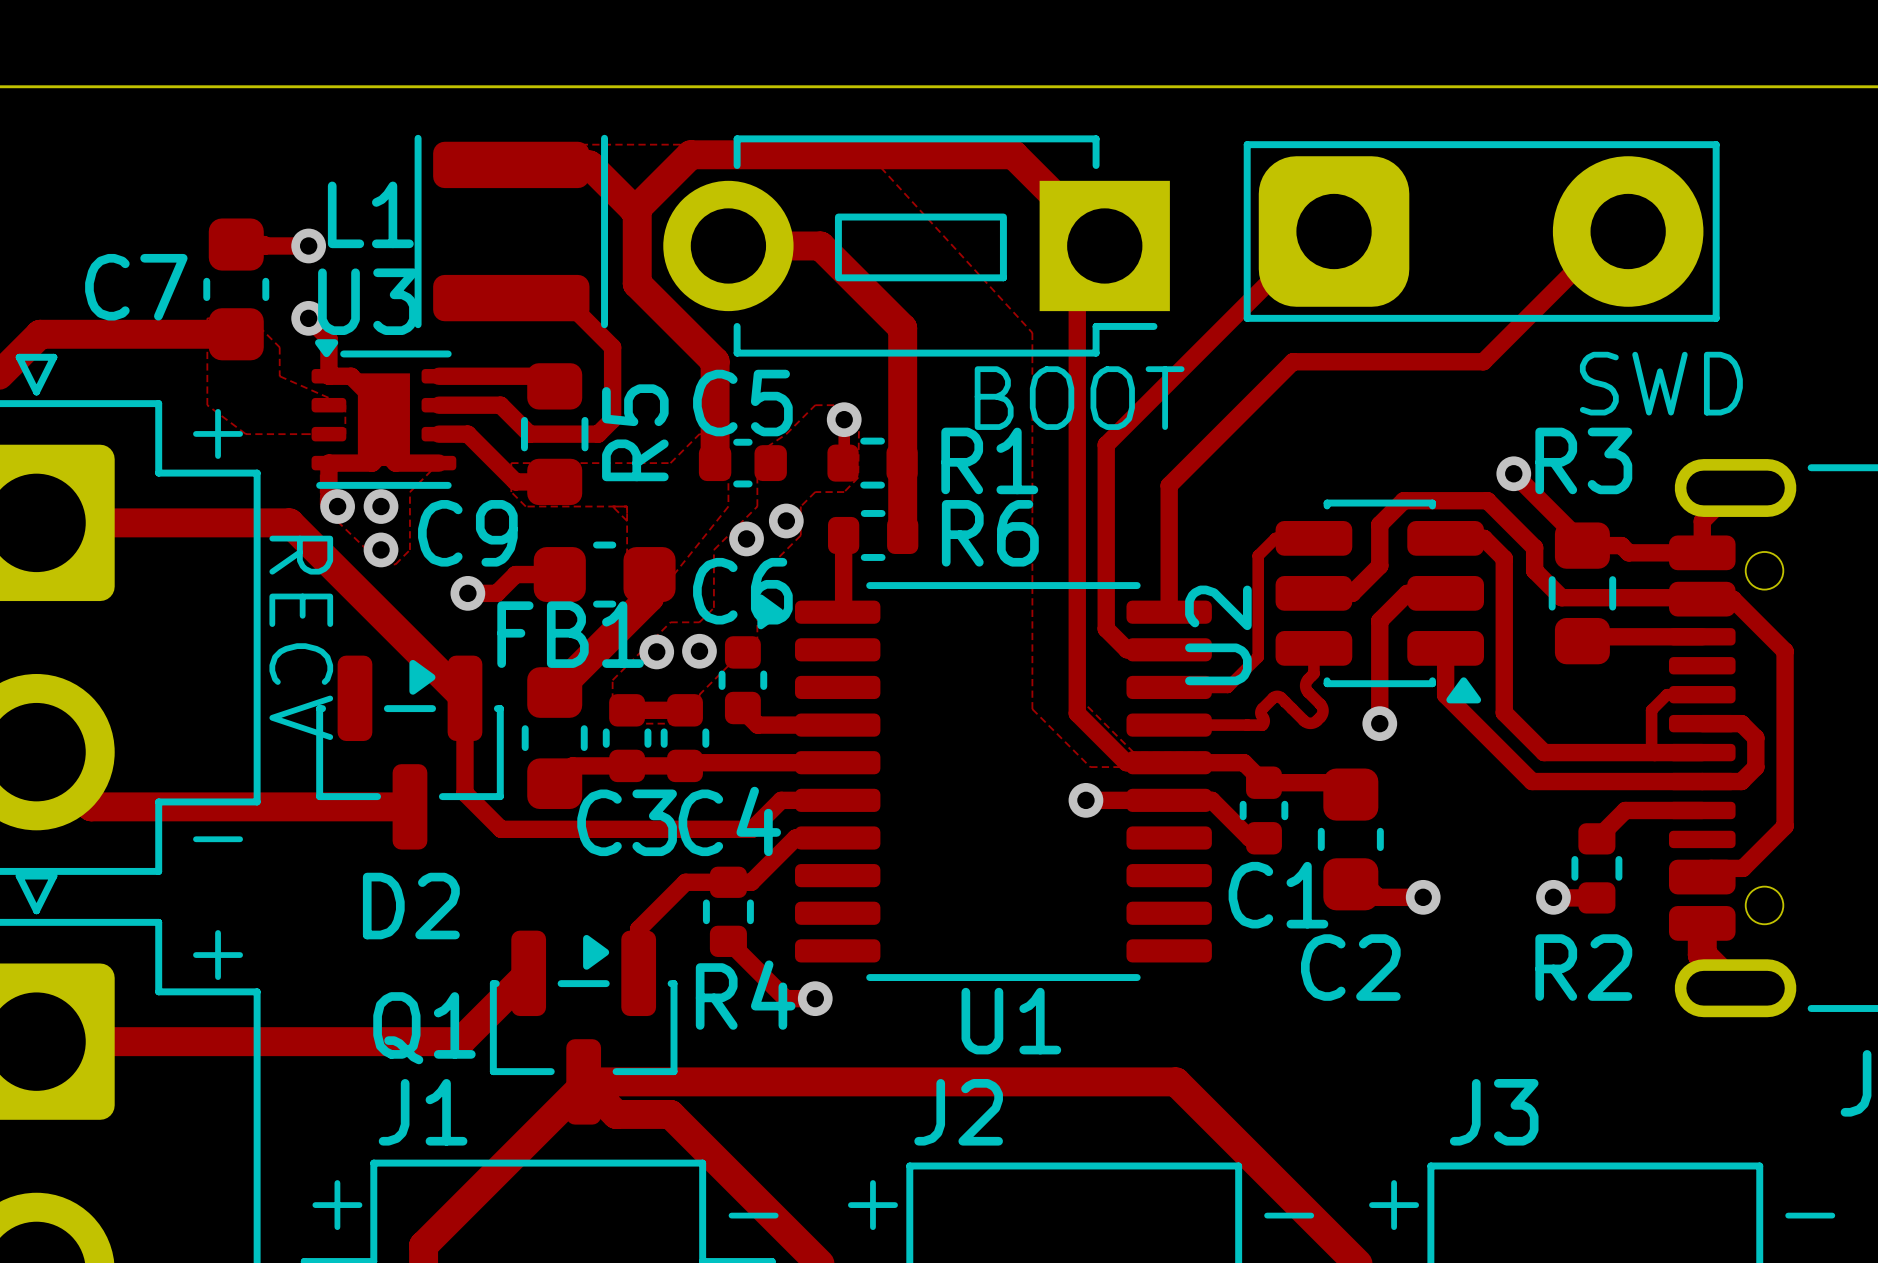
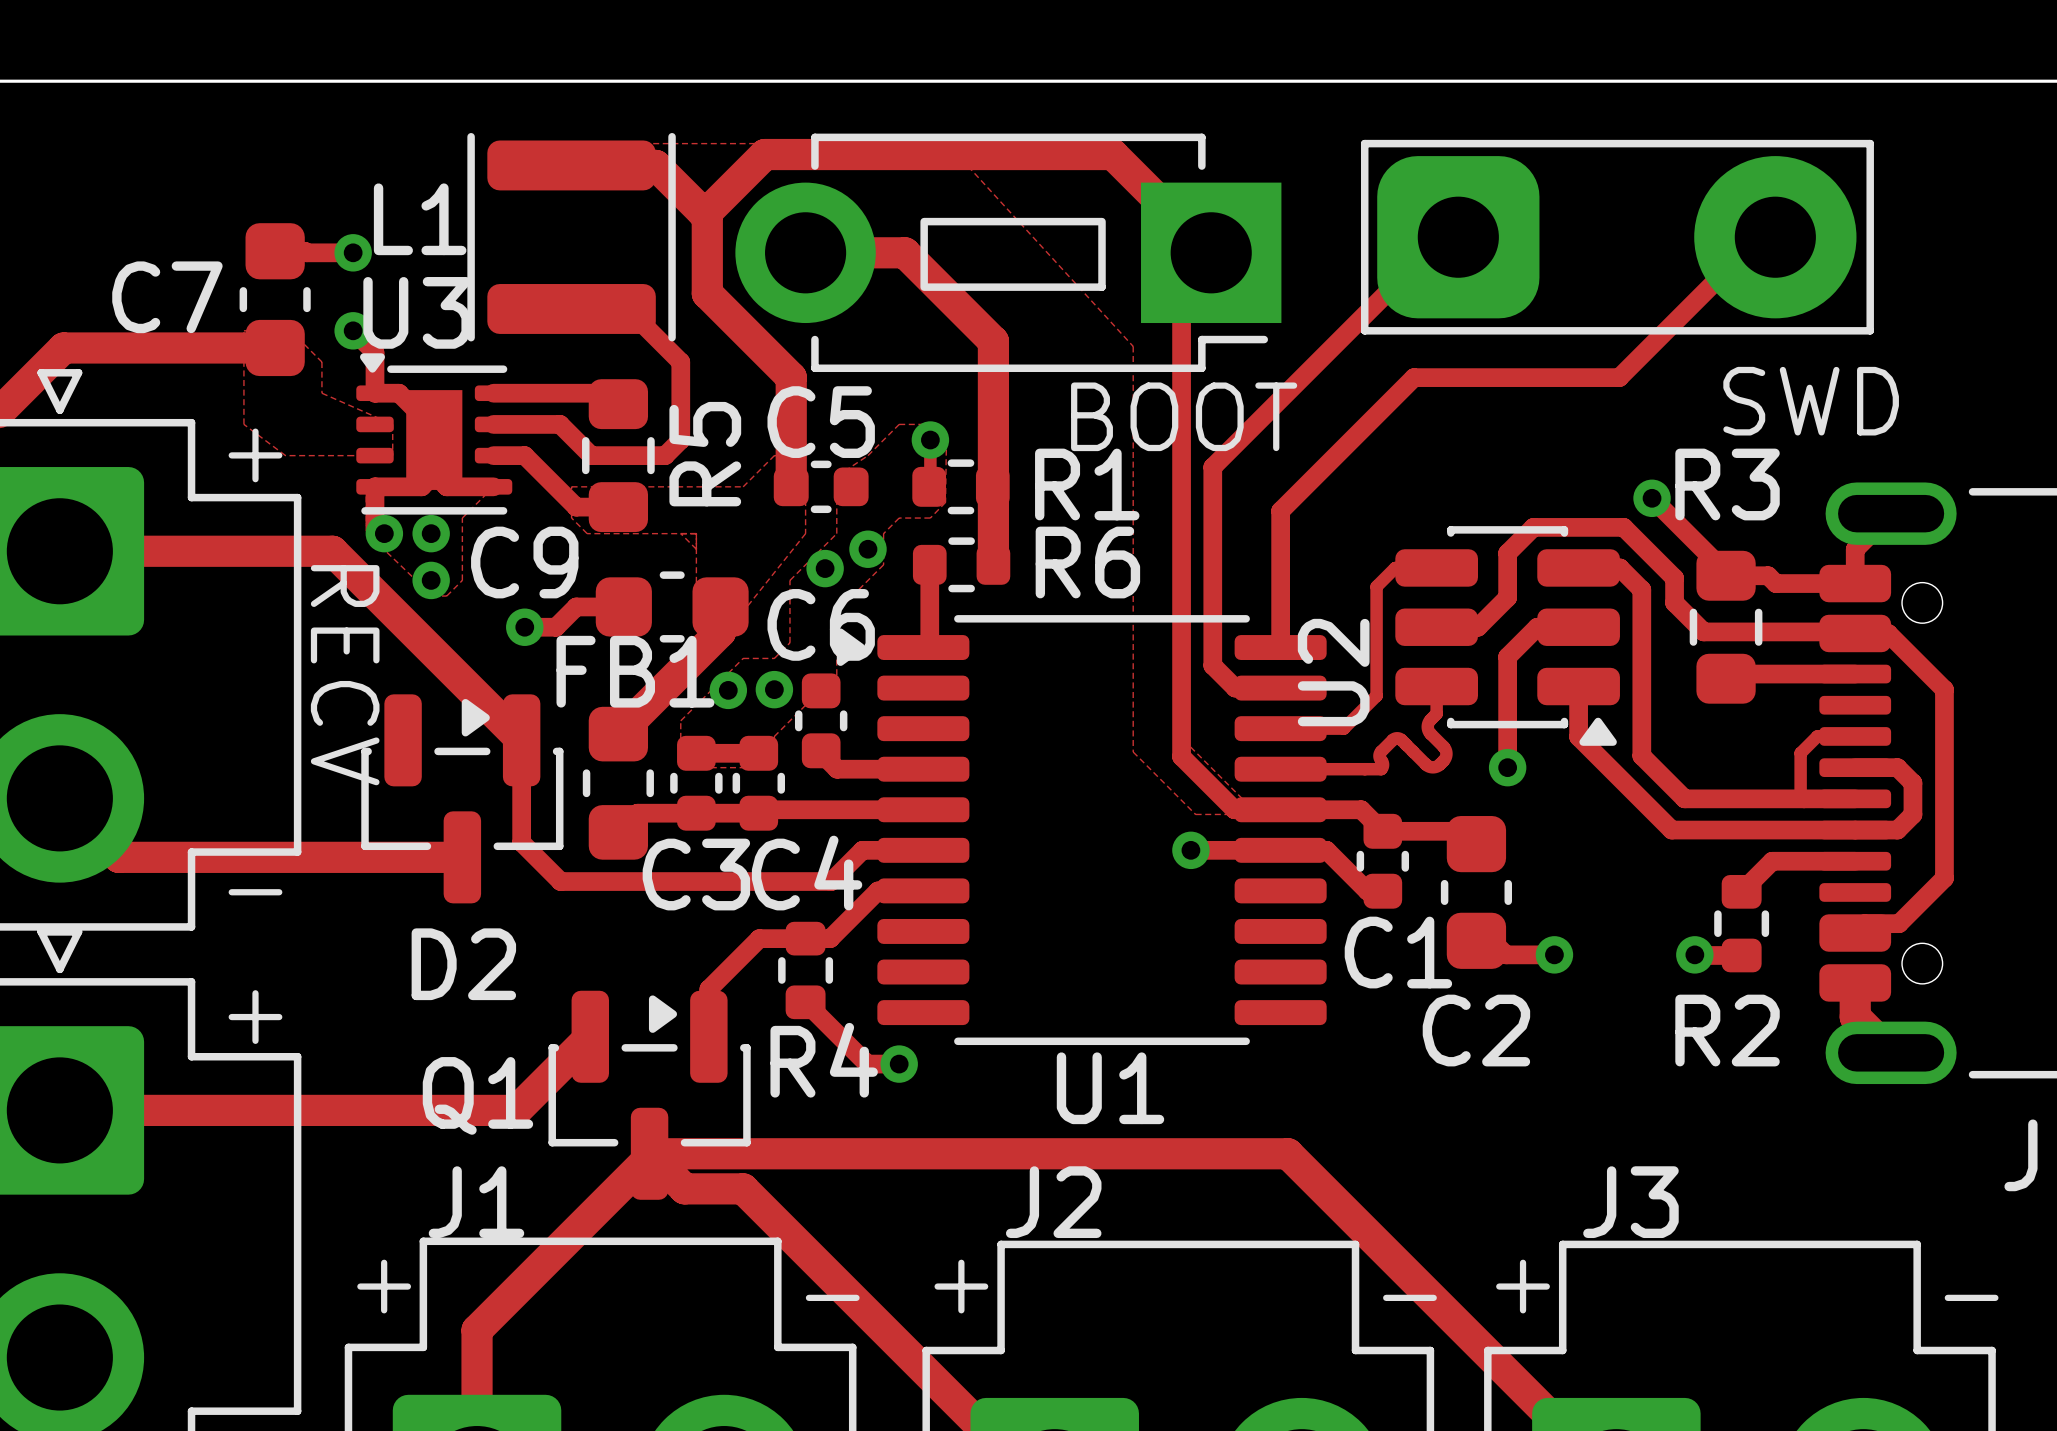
J1 name position: J1 (423, 1112) -> J1 (476, 1202)
J2 name position: J2 (958, 1112) -> J2 (1053, 1202)
J3 name position: J3 (1494, 1112) -> J3 (1630, 1202)

